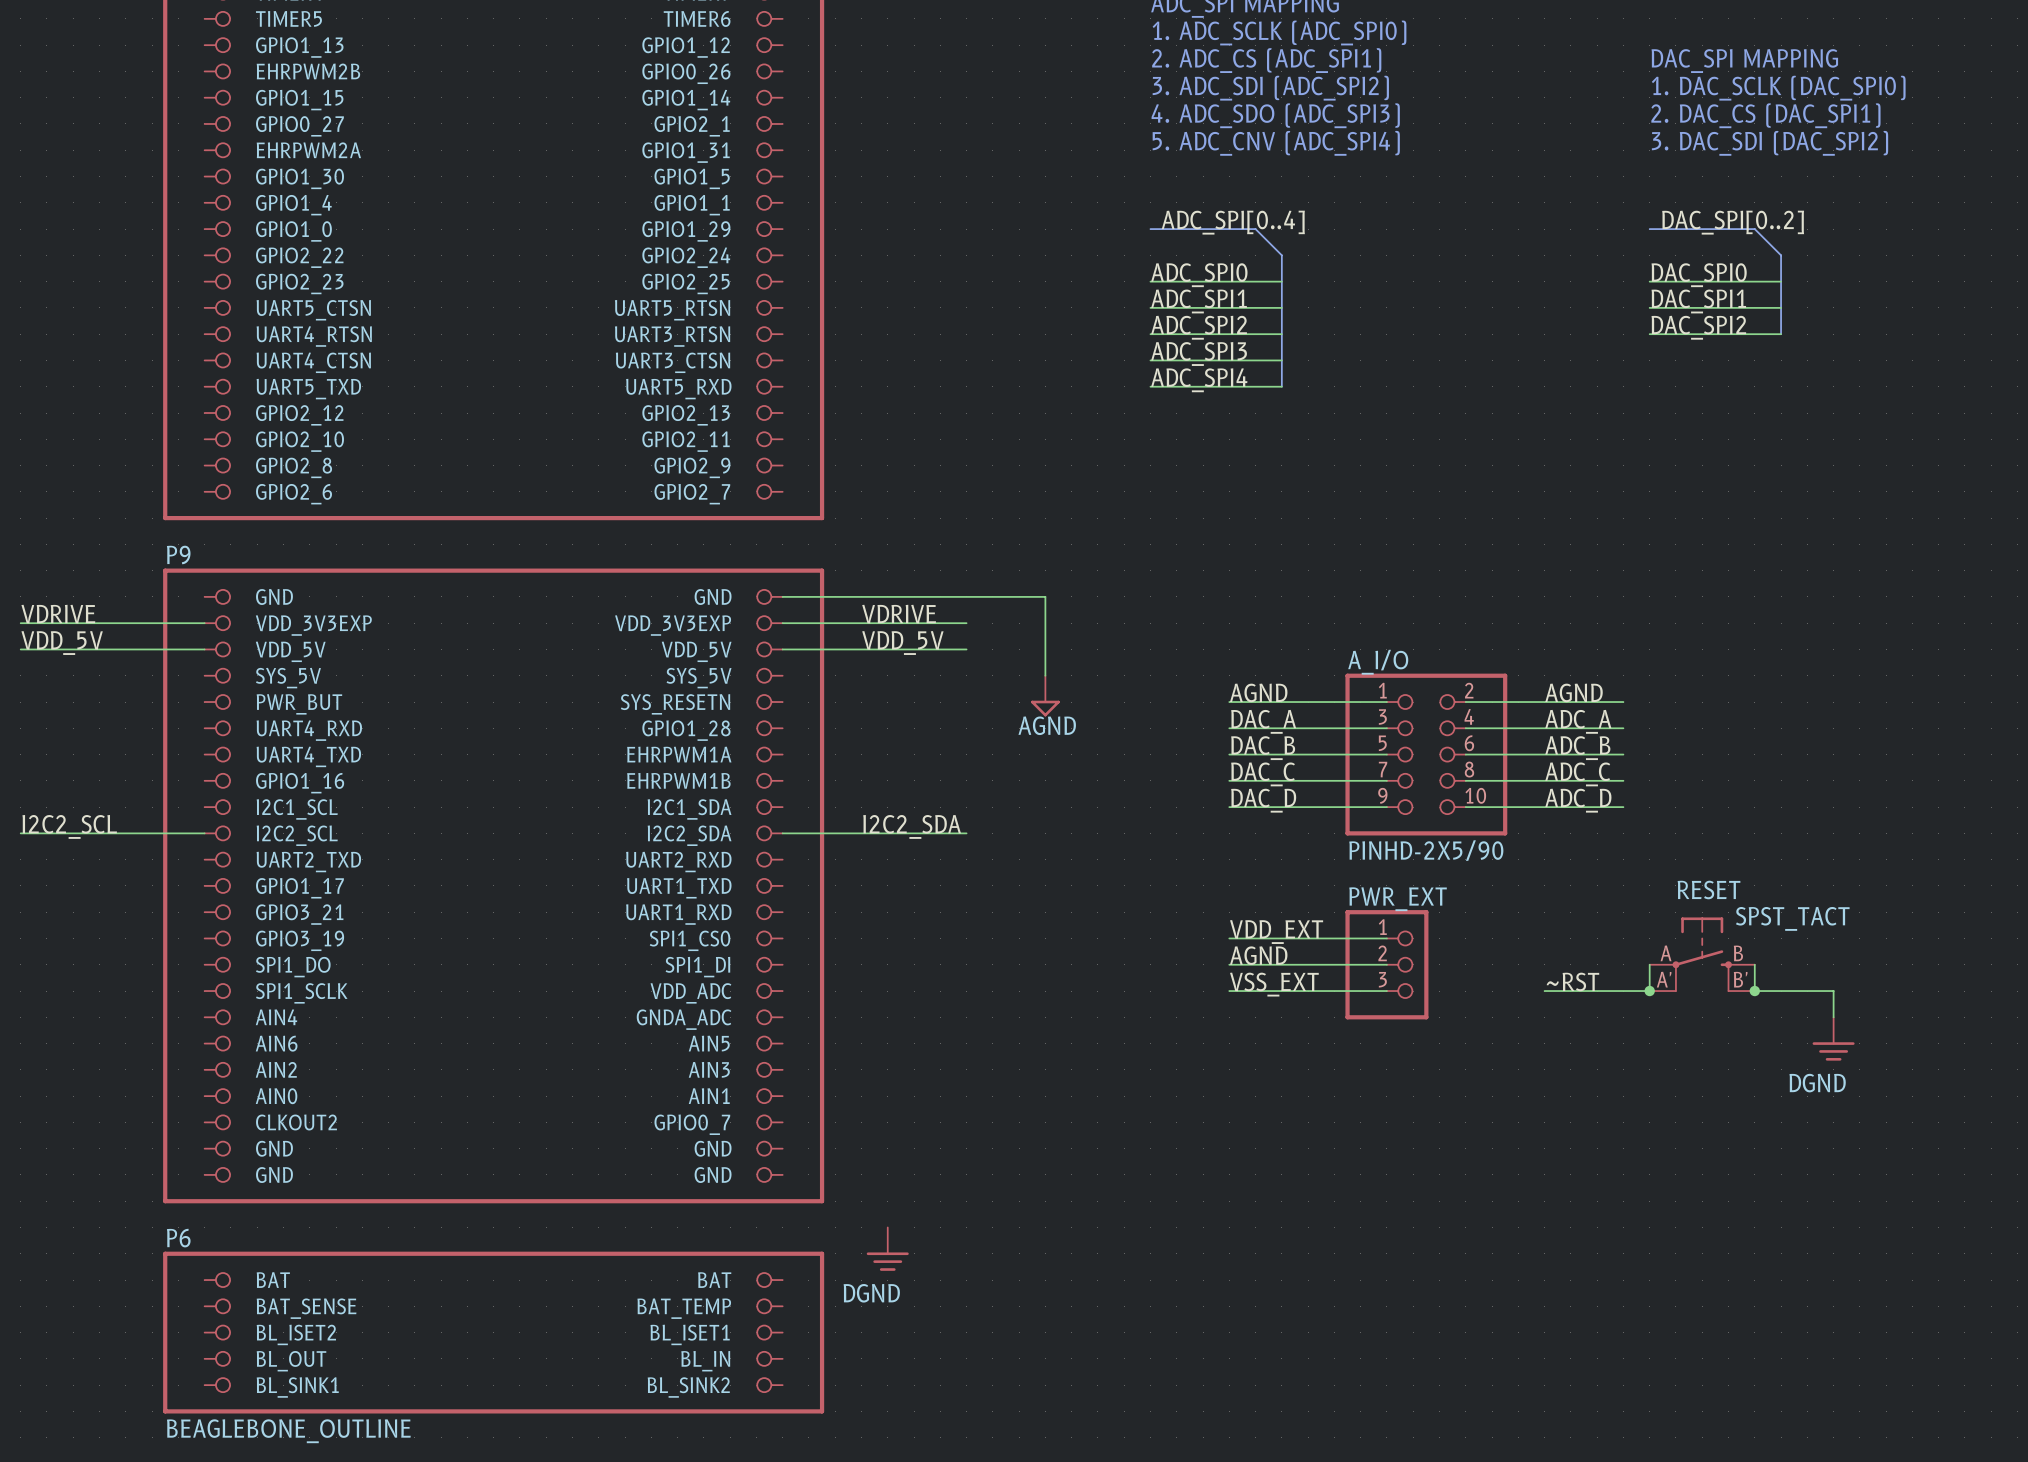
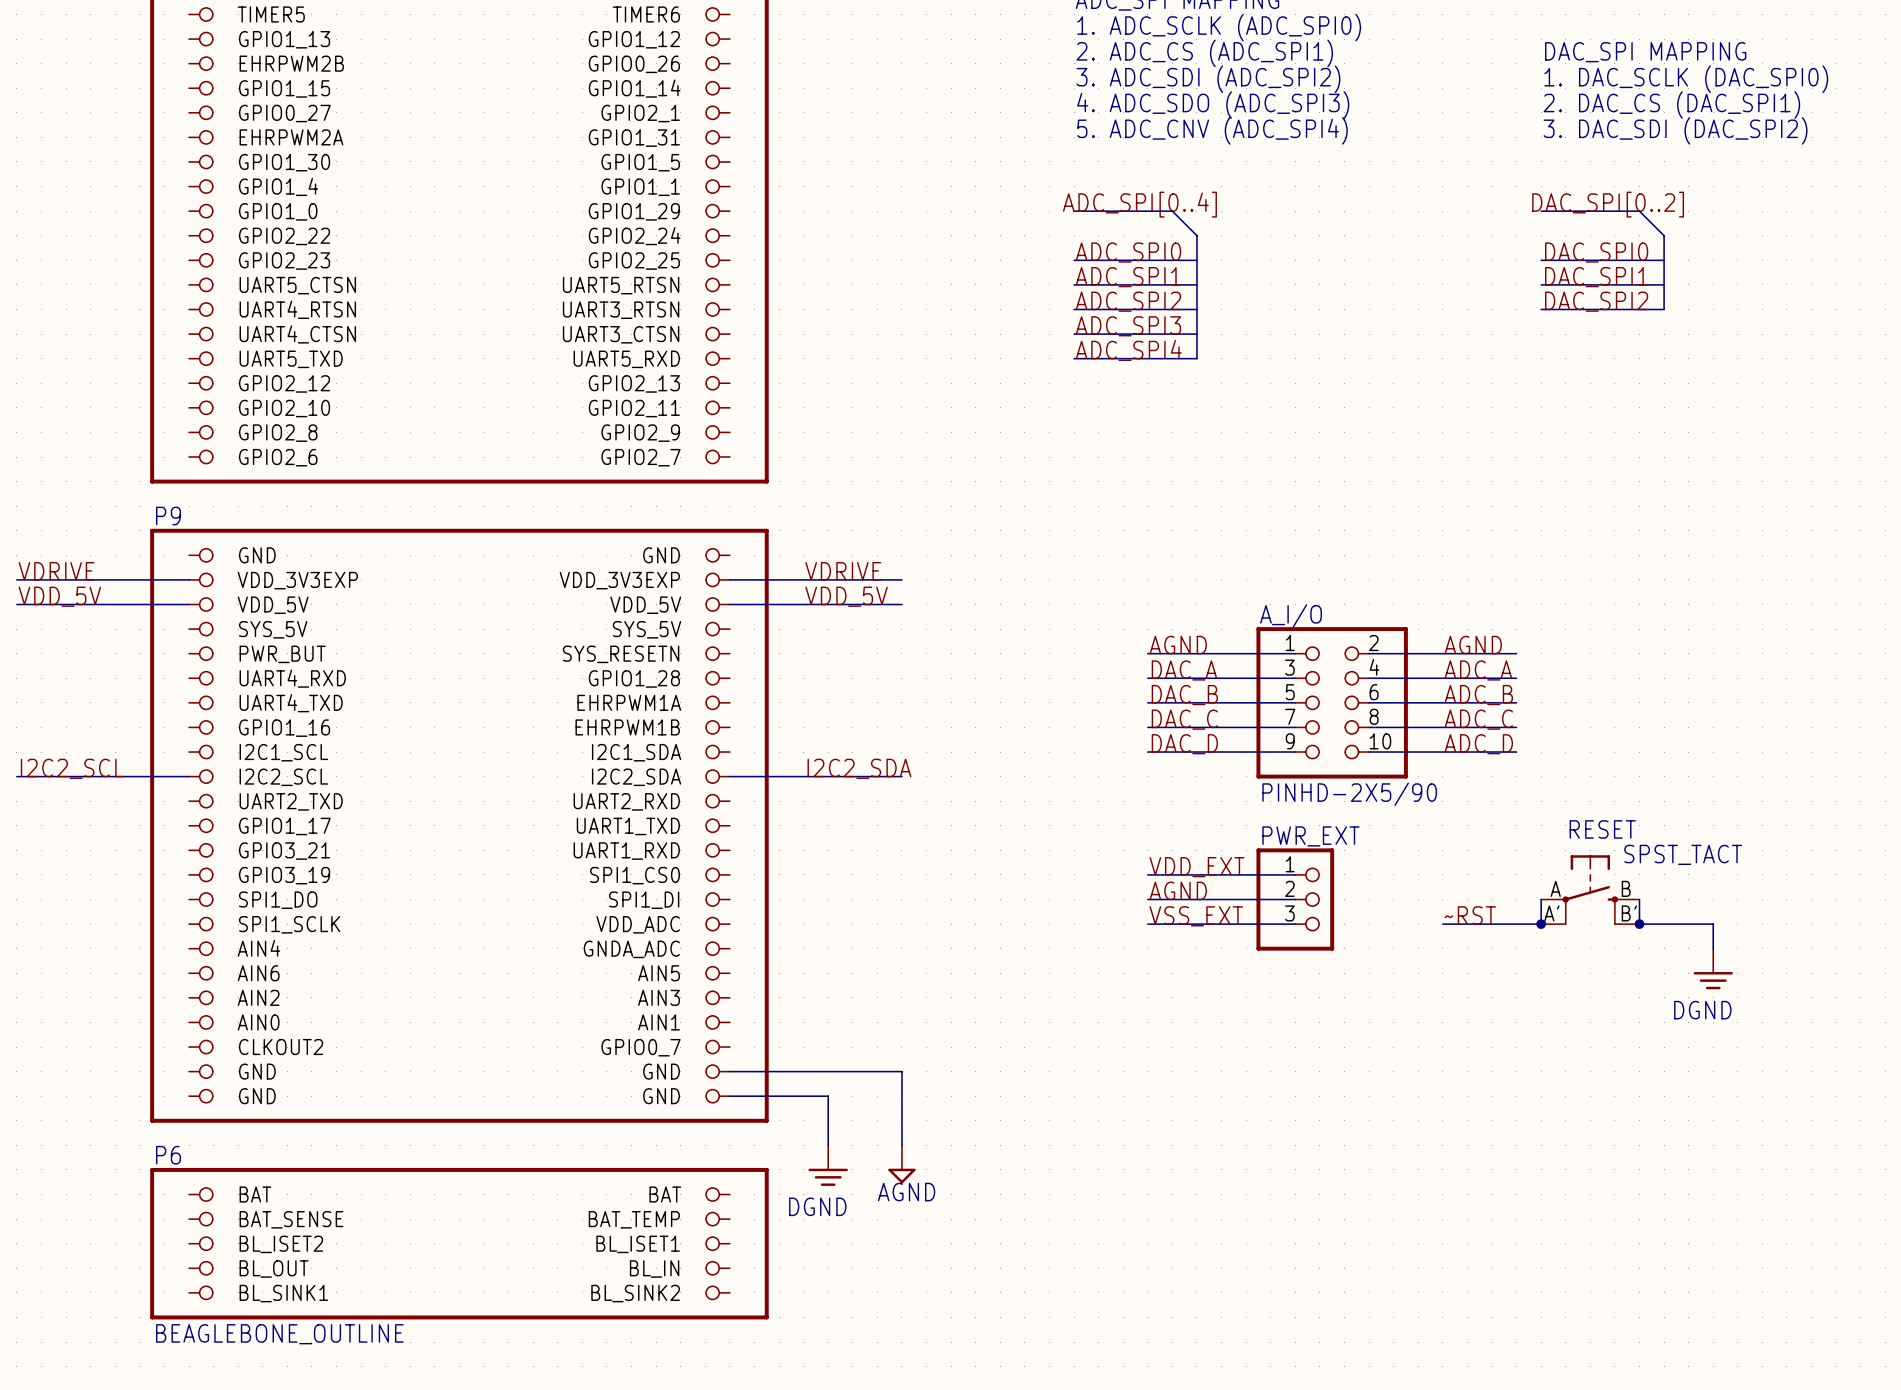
wire: (782, 596) (1045, 596) (1045, 675) -> none
power symbol: AGND (1045, 696) -> none
wire: none -> (729, 1071) (901, 1071) (901, 1145)
wire: none -> (729, 1096) (828, 1096) (828, 1145)
power symbol: none -> AGND (901, 1164)

